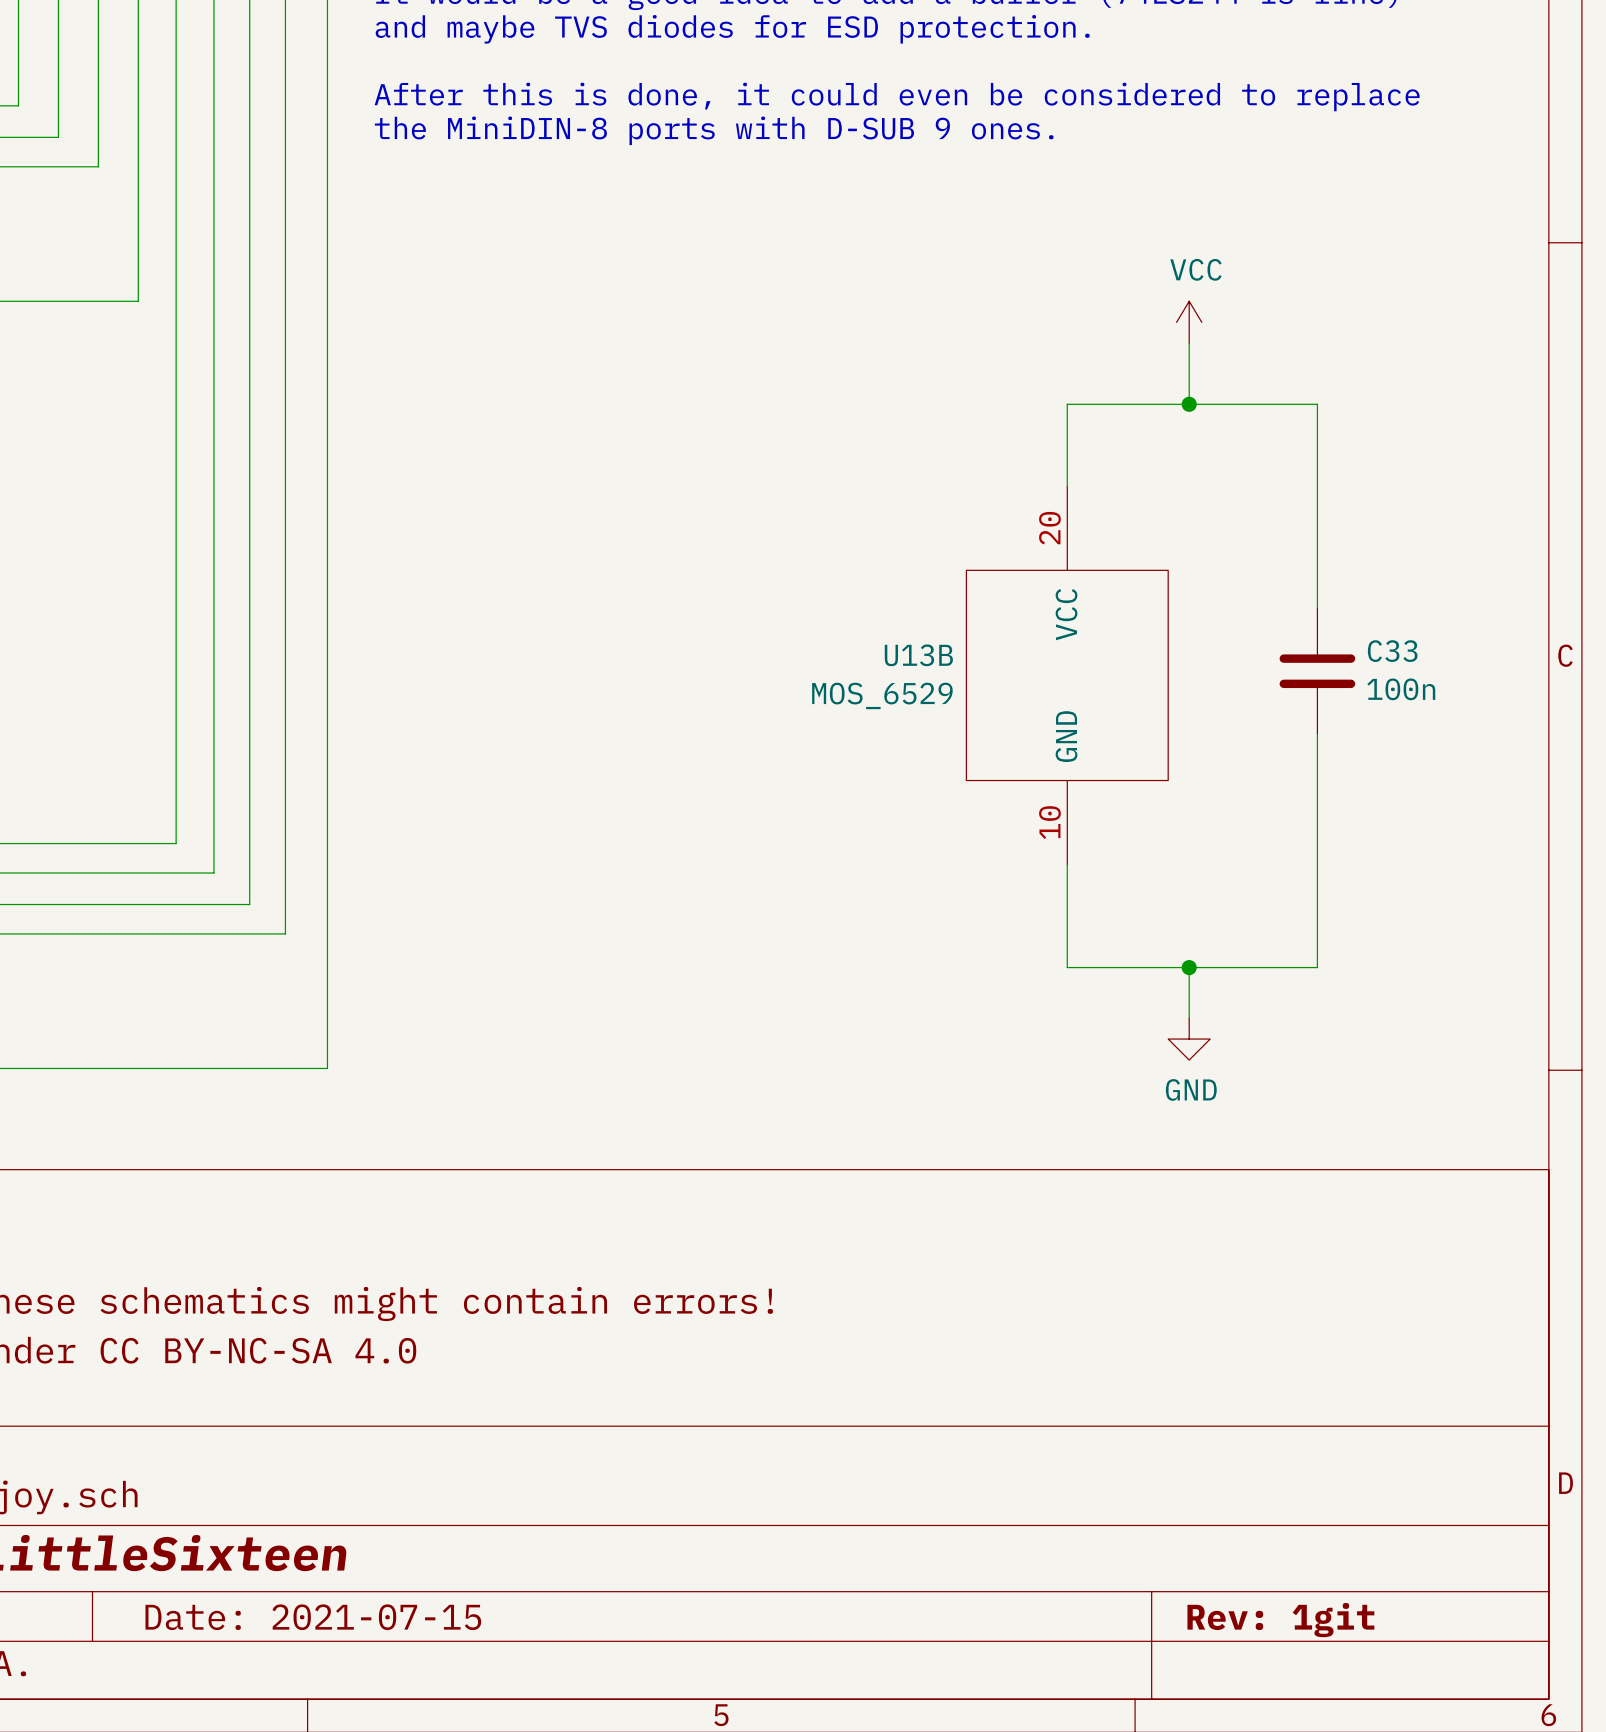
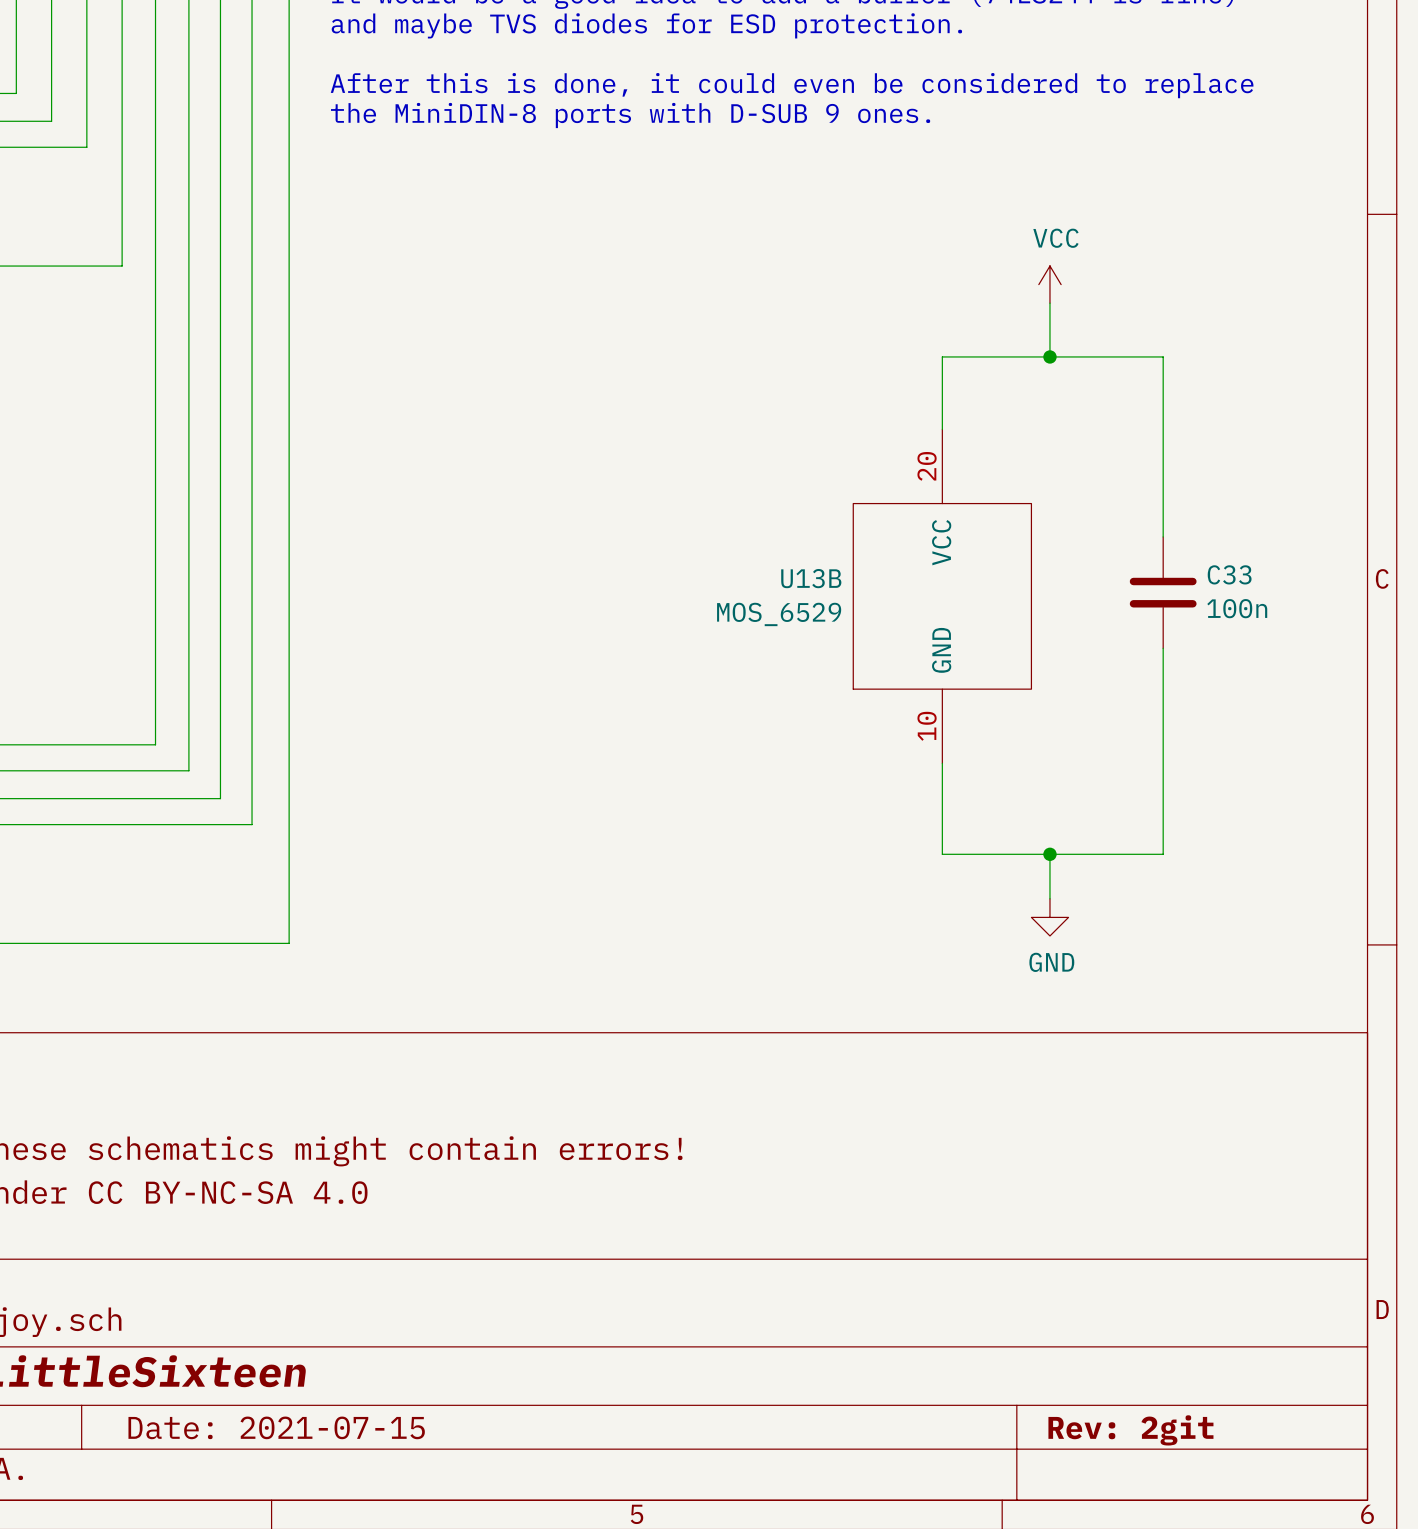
title block: Rev: 1git (1280, 1620) -> Rev: 2git (1130, 1430)

